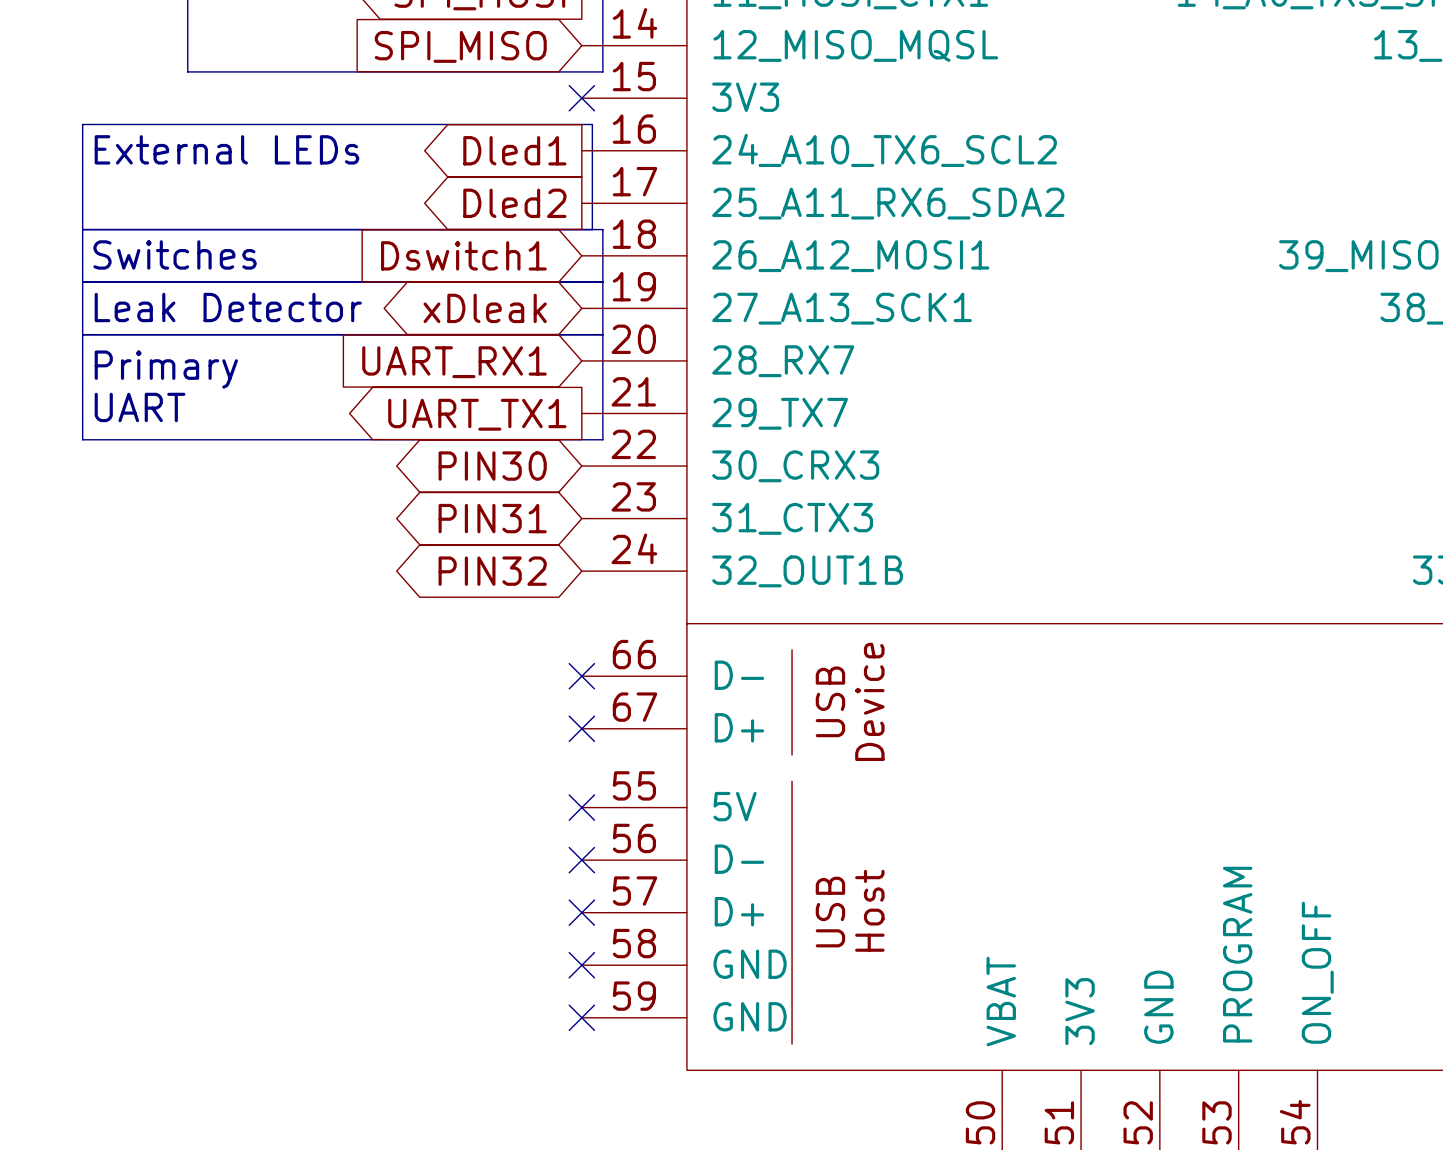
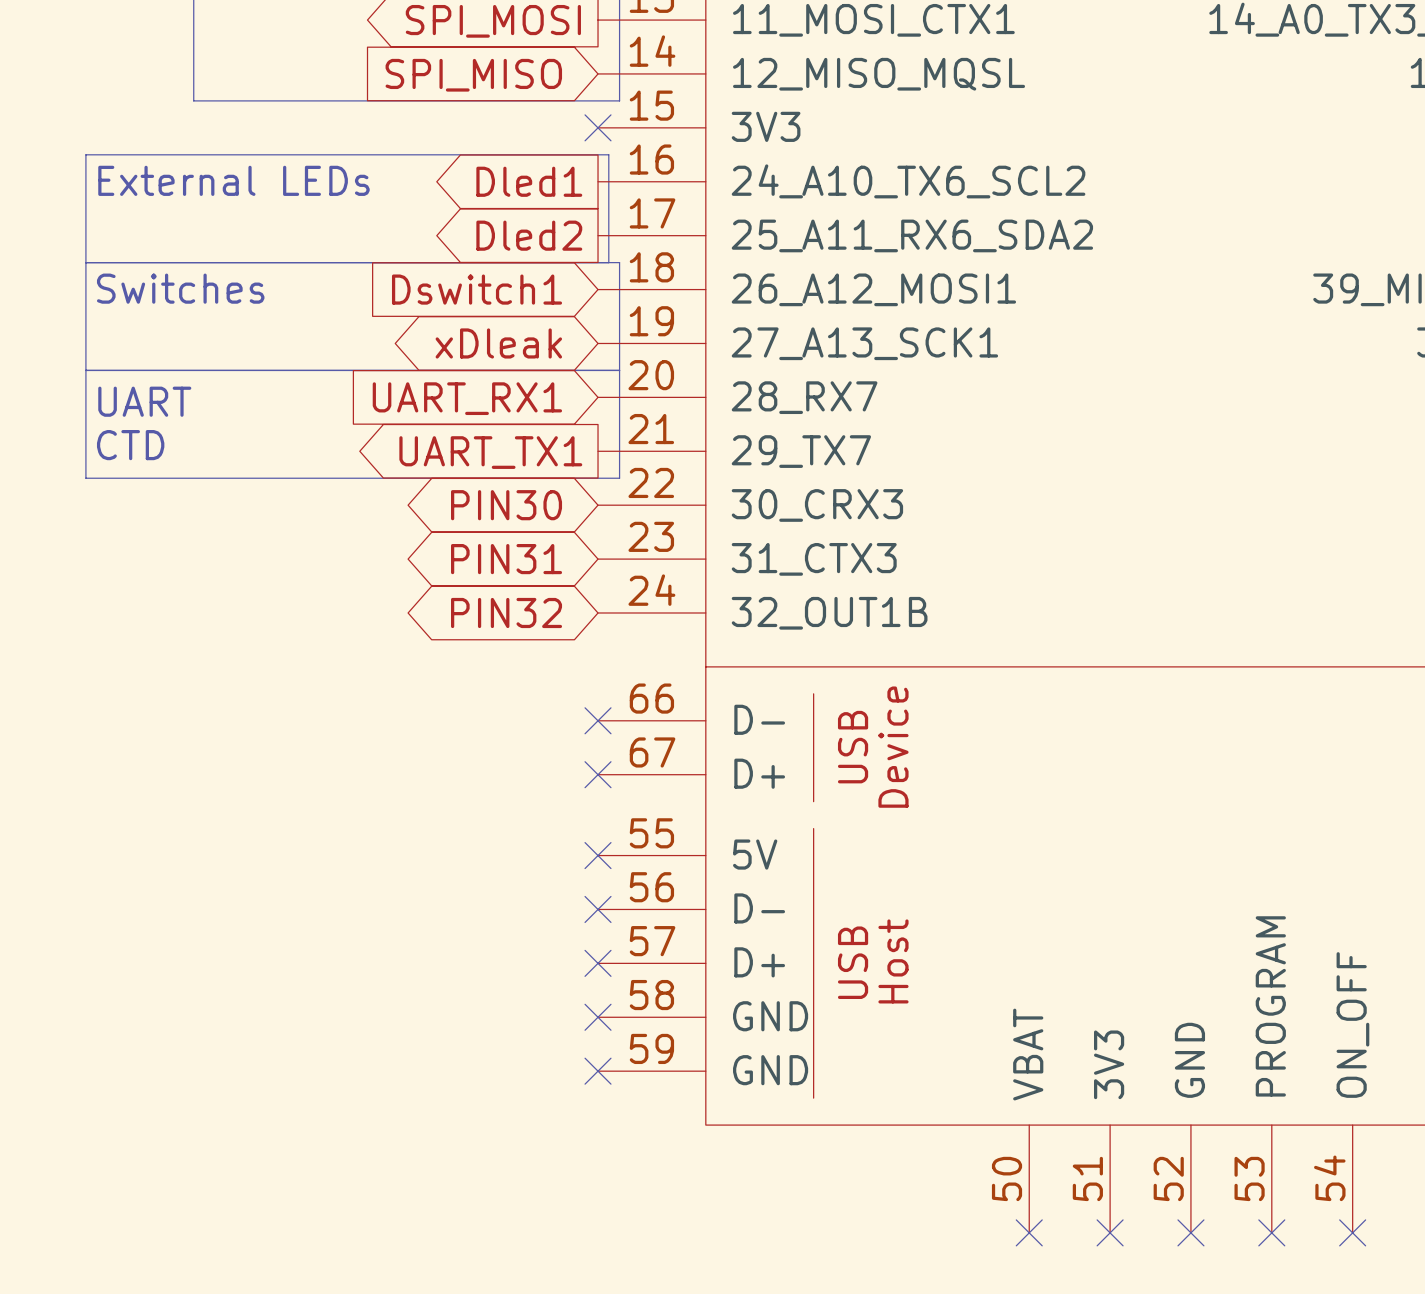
line: (82, 282) (602, 282) -> none
text: Leak Detector (228, 307) -> none
text: Primary (166, 369) -> UART (144, 401)
text: UART (140, 407) -> CTD (130, 445)

